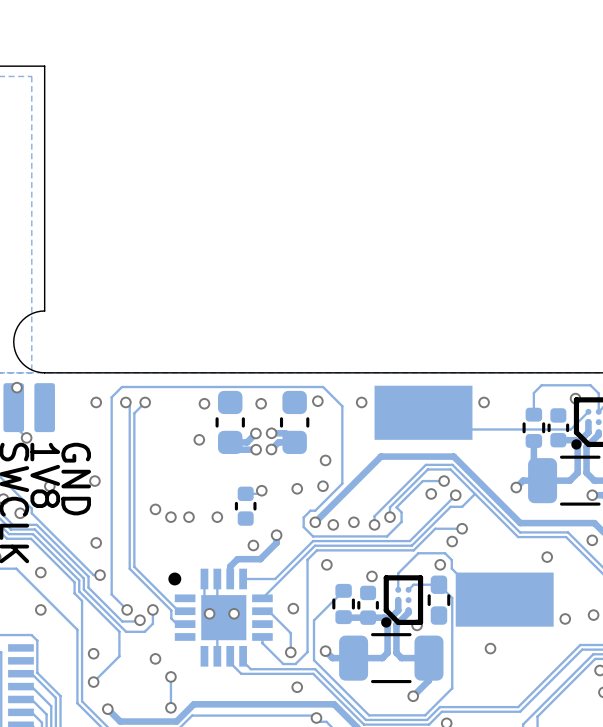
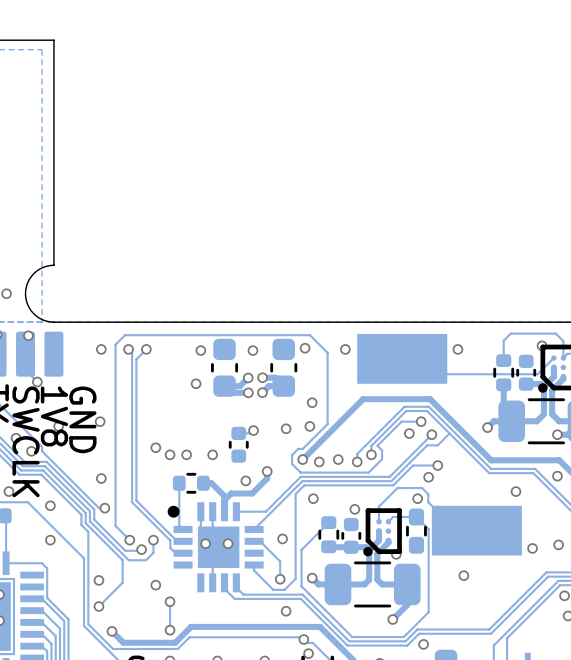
track: none -> (179, 483) (179, 525) (183, 529)
part: none -> (191, 483)
track: none -> (203, 483) (211, 483) (224, 496) (224, 500)

